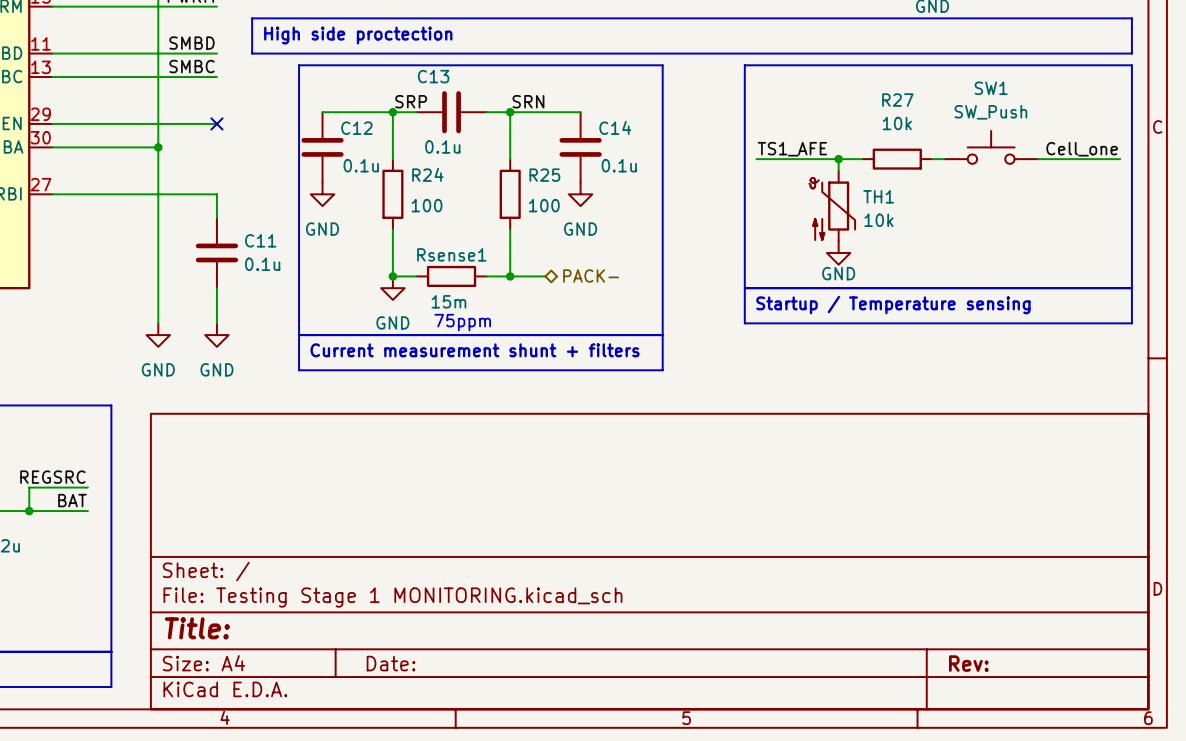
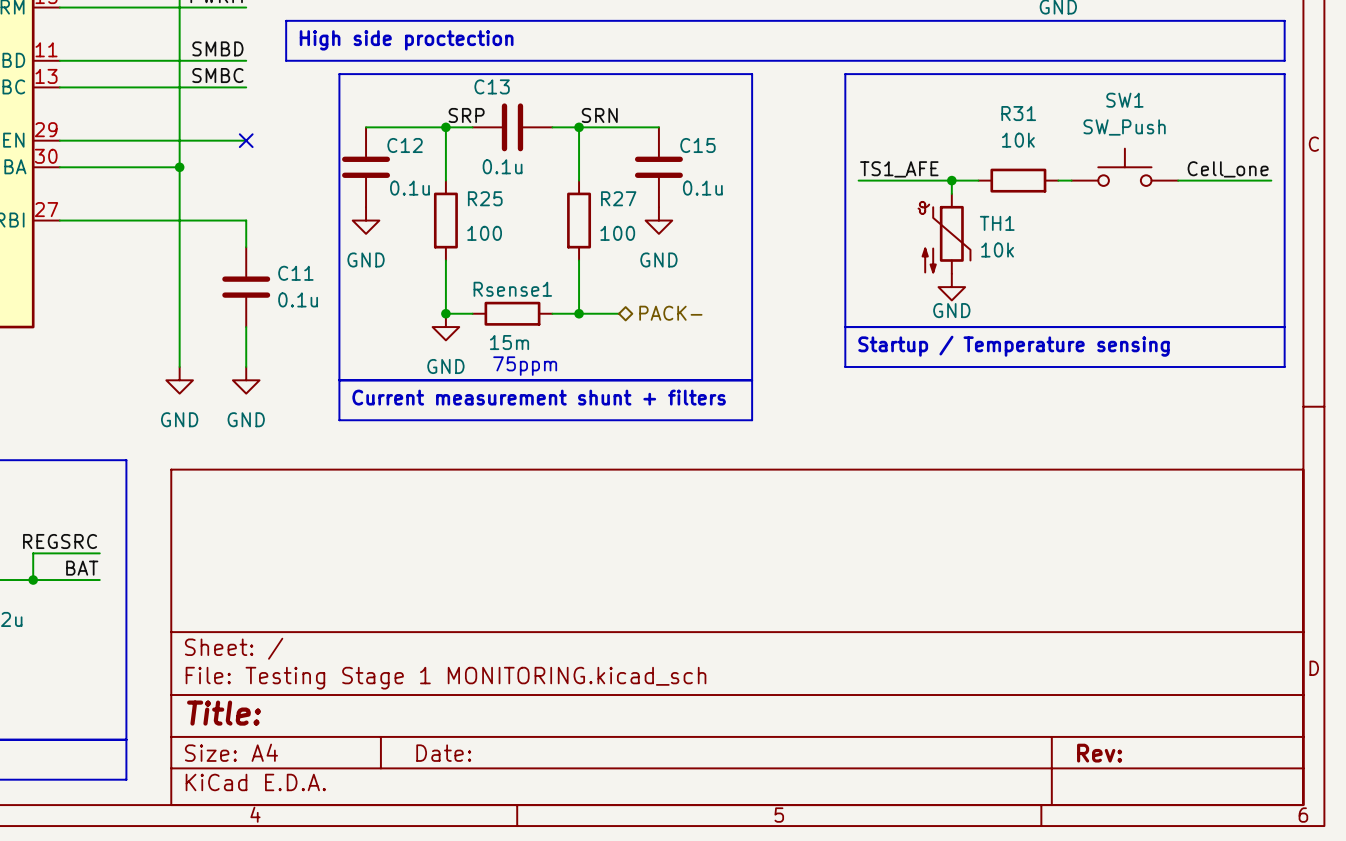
R27 name: R27 (897, 100) -> R31 (1018, 113)
C14 name: C14 (615, 127) -> C15 (697, 145)
R24 name: R24 (427, 174) -> R25 (485, 198)
R25 name: R25 (544, 175) -> R27 (618, 198)

